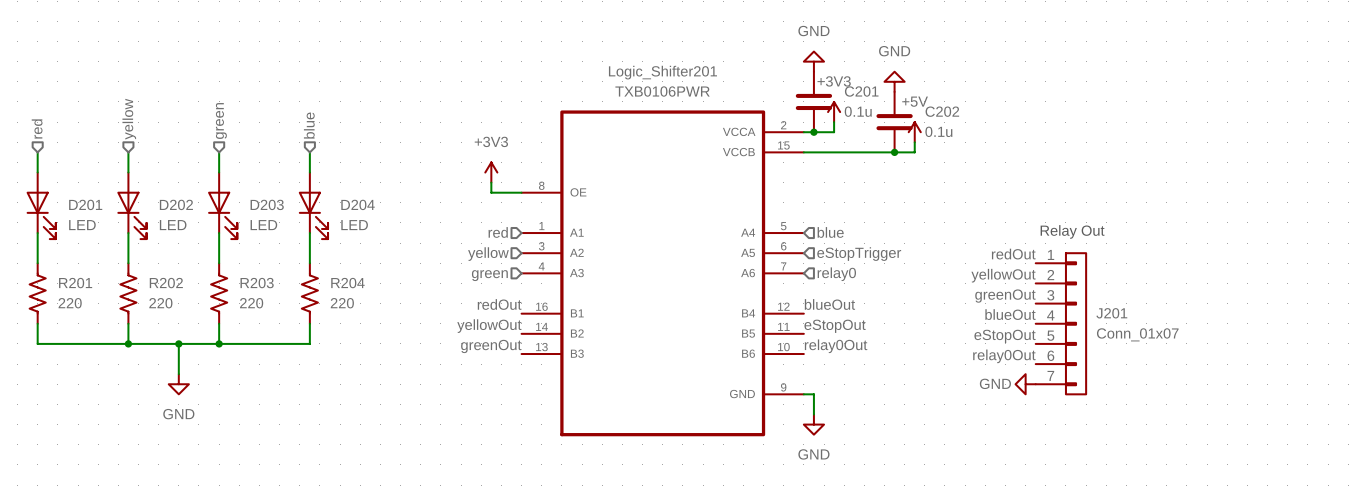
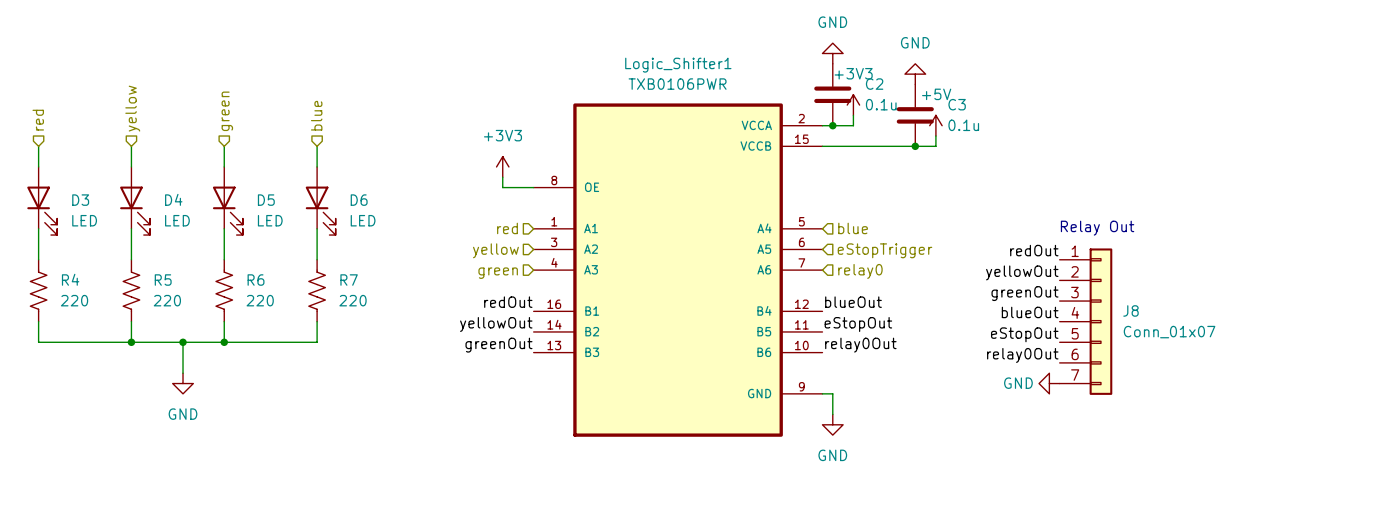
Logic_Shifter201 name: Logic_Shifter201 (662, 72) -> Logic_Shifter1 (678, 65)
C201 name: C201 (861, 91) -> C2 (874, 84)
C202 name: C202 (942, 111) -> C3 (957, 104)
D201 name: D201 (85, 204) -> D3 (80, 200)
D202 name: D202 (176, 204) -> D4 (173, 199)
D203 name: D203 (267, 204) -> D5 (266, 200)
D204 name: D204 (358, 204) -> D6 (359, 200)
R201 name: R201 (75, 283) -> R4 (70, 279)
R202 name: R202 (166, 283) -> R5 (163, 280)
R203 name: R203 (257, 283) -> R6 (256, 280)
R204 name: R204 (347, 283) -> R7 (349, 280)
J201 name: J201 (1111, 313) -> J8 (1130, 310)

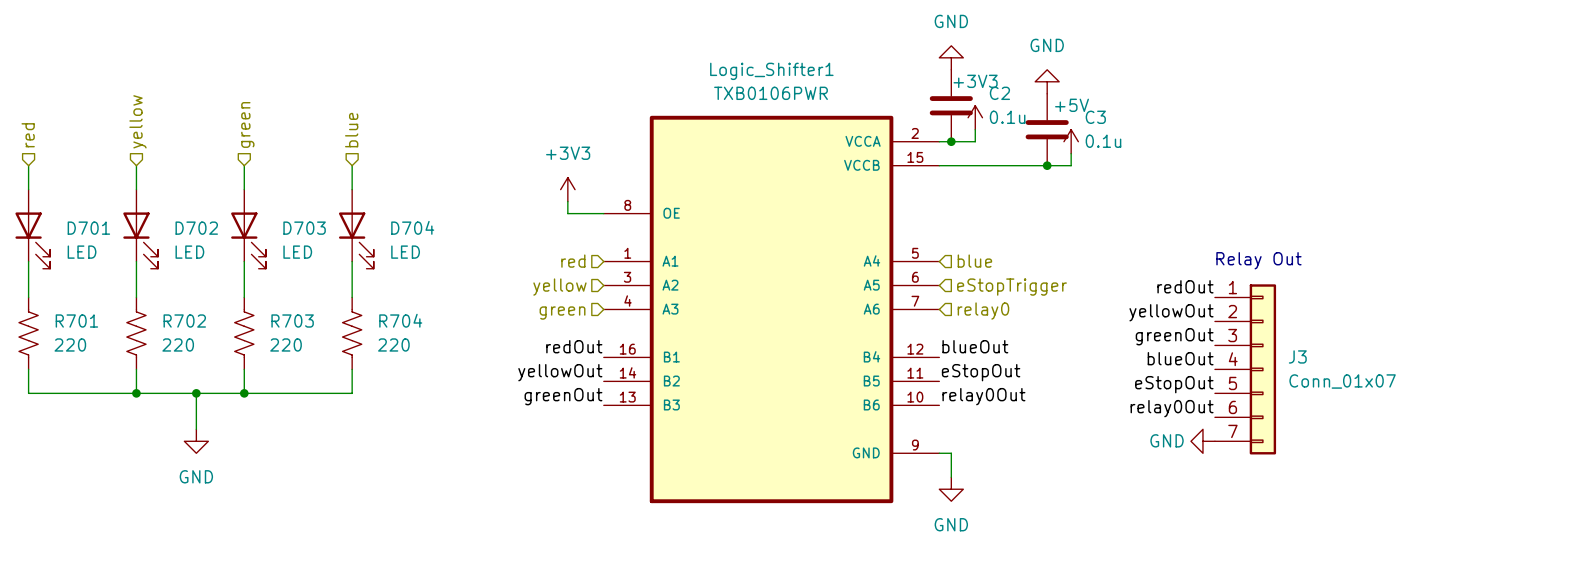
D4 name: D4 (173, 199) -> D702 (196, 228)
D3 name: D3 (80, 200) -> D701 (88, 228)
D5 name: D5 (266, 200) -> D703 (304, 228)
D6 name: D6 (359, 200) -> D704 (412, 227)
R4 name: R4 (70, 279) -> R701 (76, 321)
R5 name: R5 (163, 280) -> R702 (184, 321)
R6 name: R6 (256, 280) -> R703 (292, 321)
R7 name: R7 (349, 280) -> R704 (400, 320)
J8 name: J8 (1130, 310) -> J3 (1297, 356)

